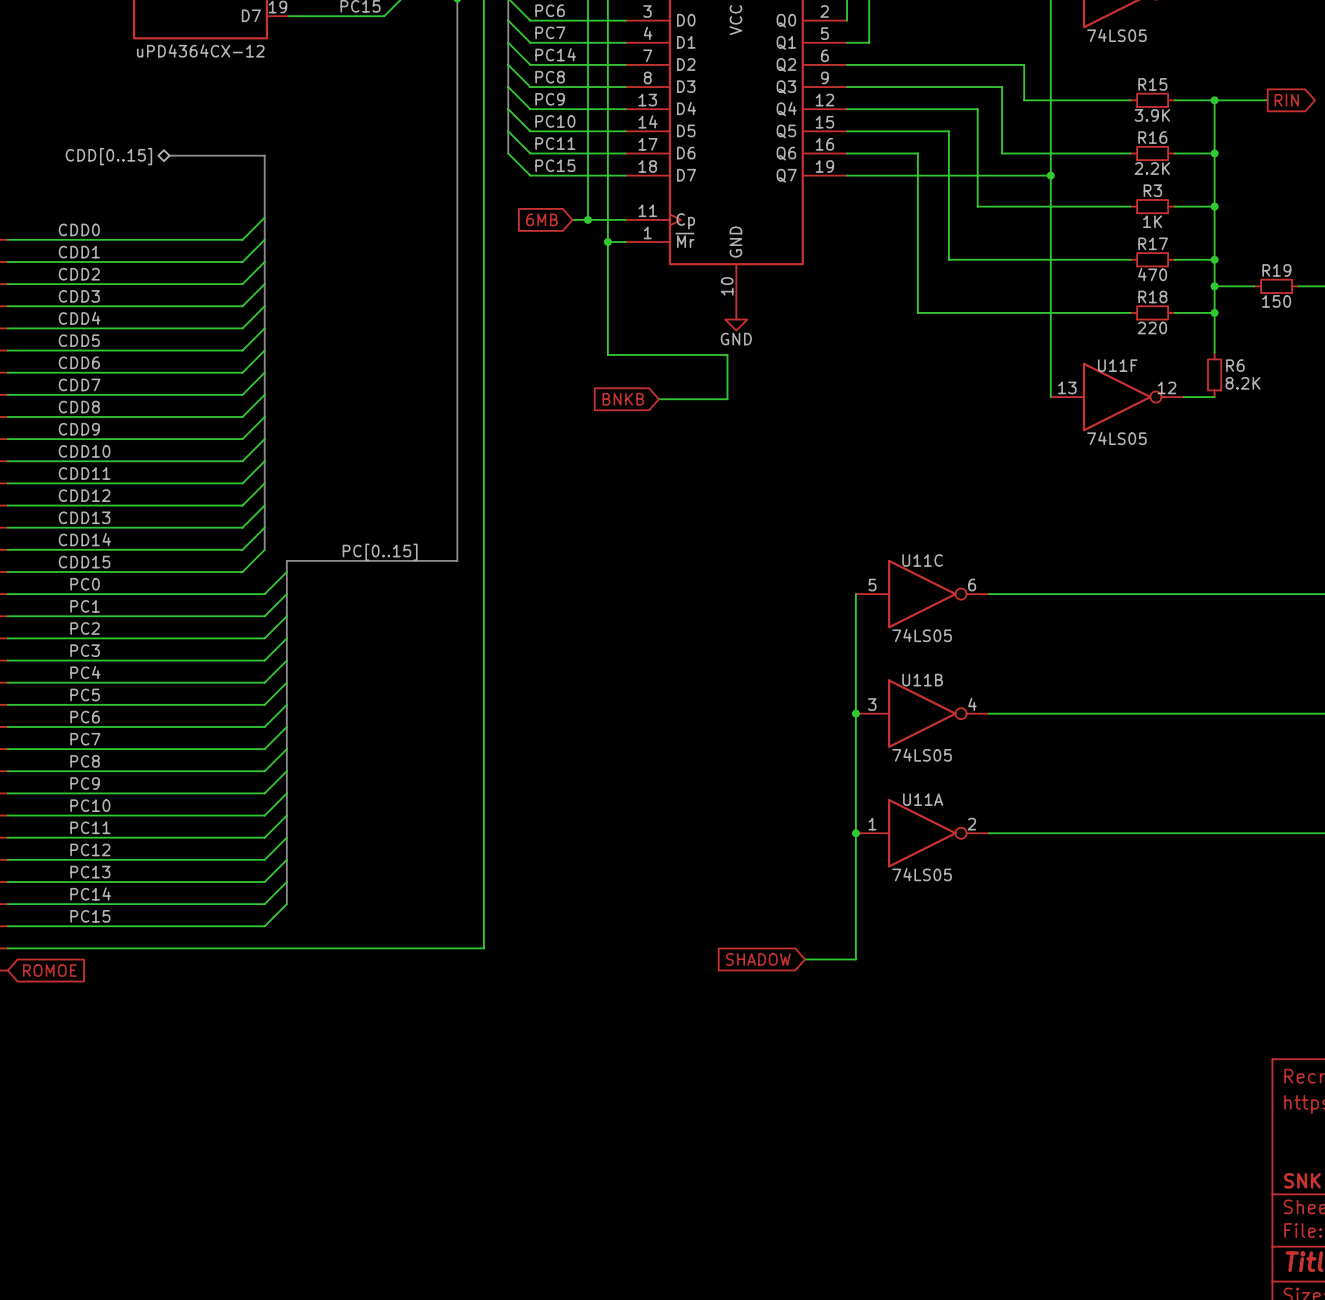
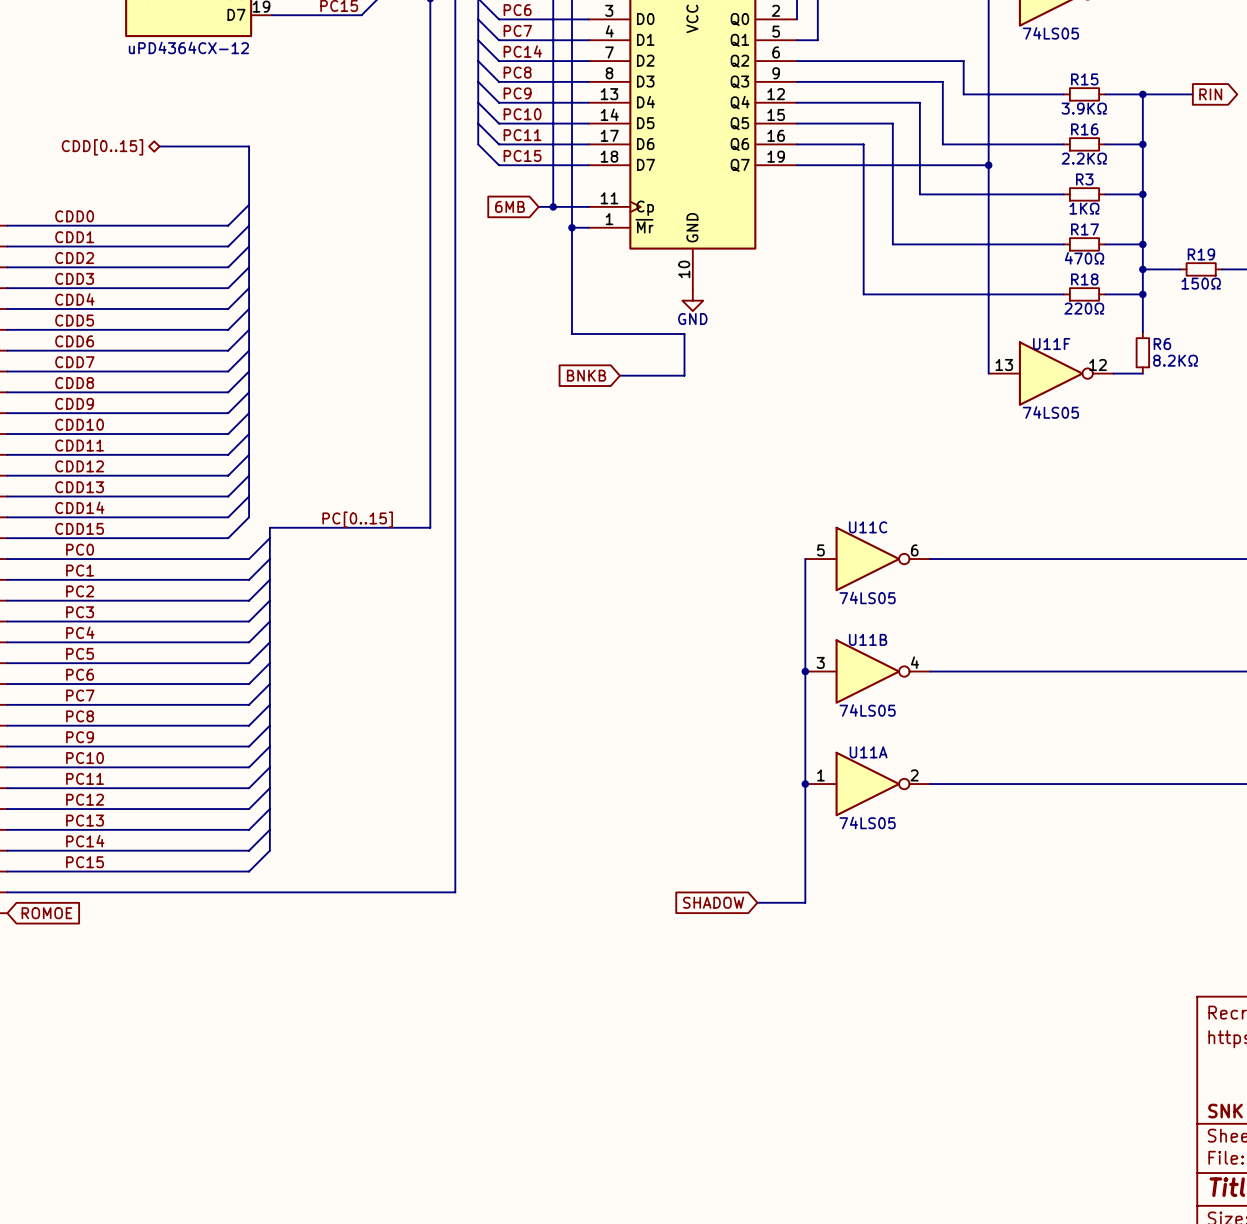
R15 value: 3.9K (1152, 115) -> 3.9KΩ (1084, 108)
R16 value: 2.2K (1152, 168) -> 2.2KΩ (1084, 158)
R3 value: 1K (1152, 221) -> 1KΩ (1084, 208)
R17 value: 470 (1152, 274) -> 470Ω (1084, 258)
R19 value: 150 (1276, 301) -> 150Ω (1201, 283)
R18 value: 220 (1152, 327) -> 220Ω (1084, 308)
R6 value: 8.2K (1243, 383) -> 8.2KΩ (1175, 360)

